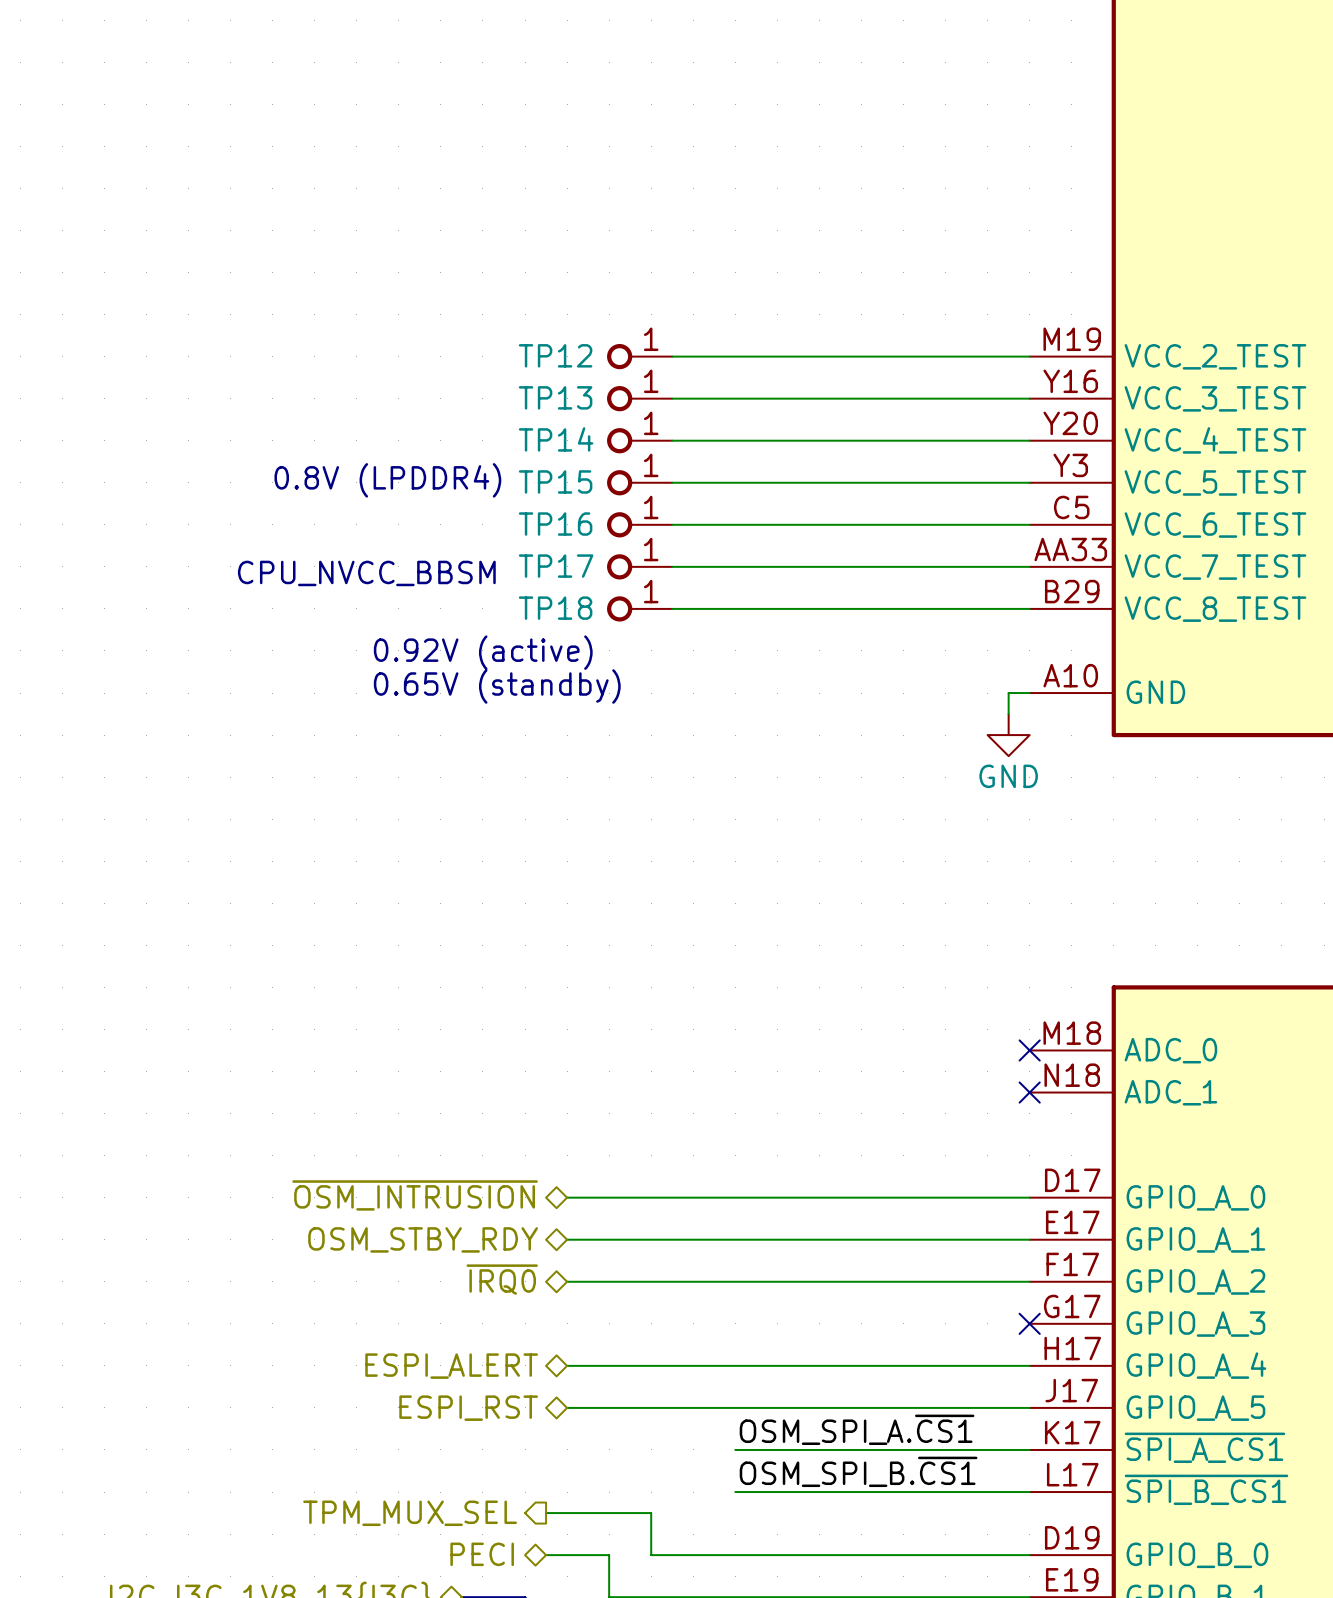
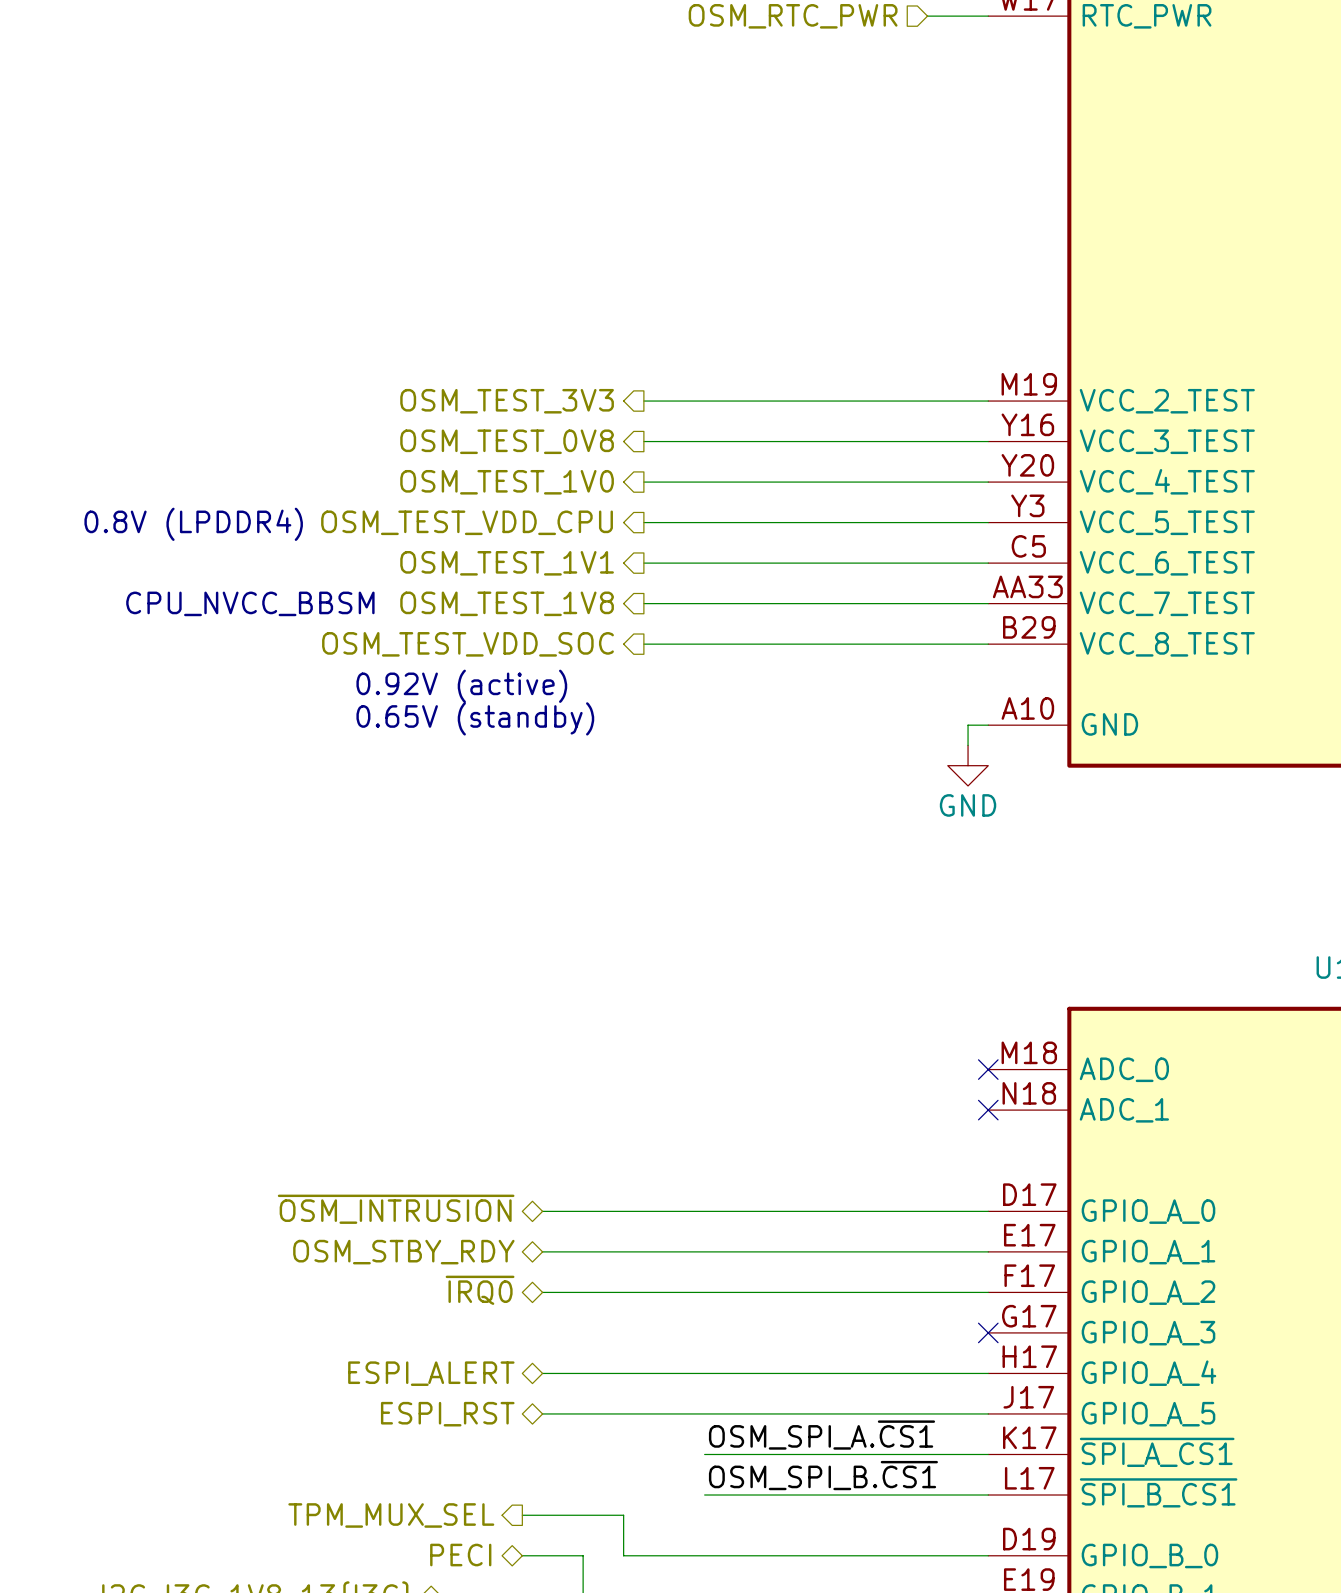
hierarchical label: none -> OSM_TEST_3V3 (507, 401)
TP12: (639, 356) -> none
hierarchical label: none -> OSM_TEST_0V8 (507, 441)
TP13: (639, 398) -> none
hierarchical label: none -> OSM_TEST_1V0 (507, 482)
TP14: (639, 440) -> none
text position: 0.8V (LPDDR4) (387, 480) -> 0.8V (LPDDR4) (193, 524)
hierarchical label: none -> OSM_TEST_VDD_CPU (467, 522)
TP15: (639, 482) -> none
TP16: (639, 524) -> none
hierarchical label: none -> OSM_TEST_1V1 (507, 563)
TP17: (639, 566) -> none
hierarchical label: none -> OSM_TEST_1V8 (507, 603)
text position: CPU_NVCC_BBSM (366, 573) -> CPU_NVCC_BBSM (250, 603)
TP18: (639, 608) -> none
hierarchical label: none -> OSM_TEST_VDD_SOC (468, 644)

